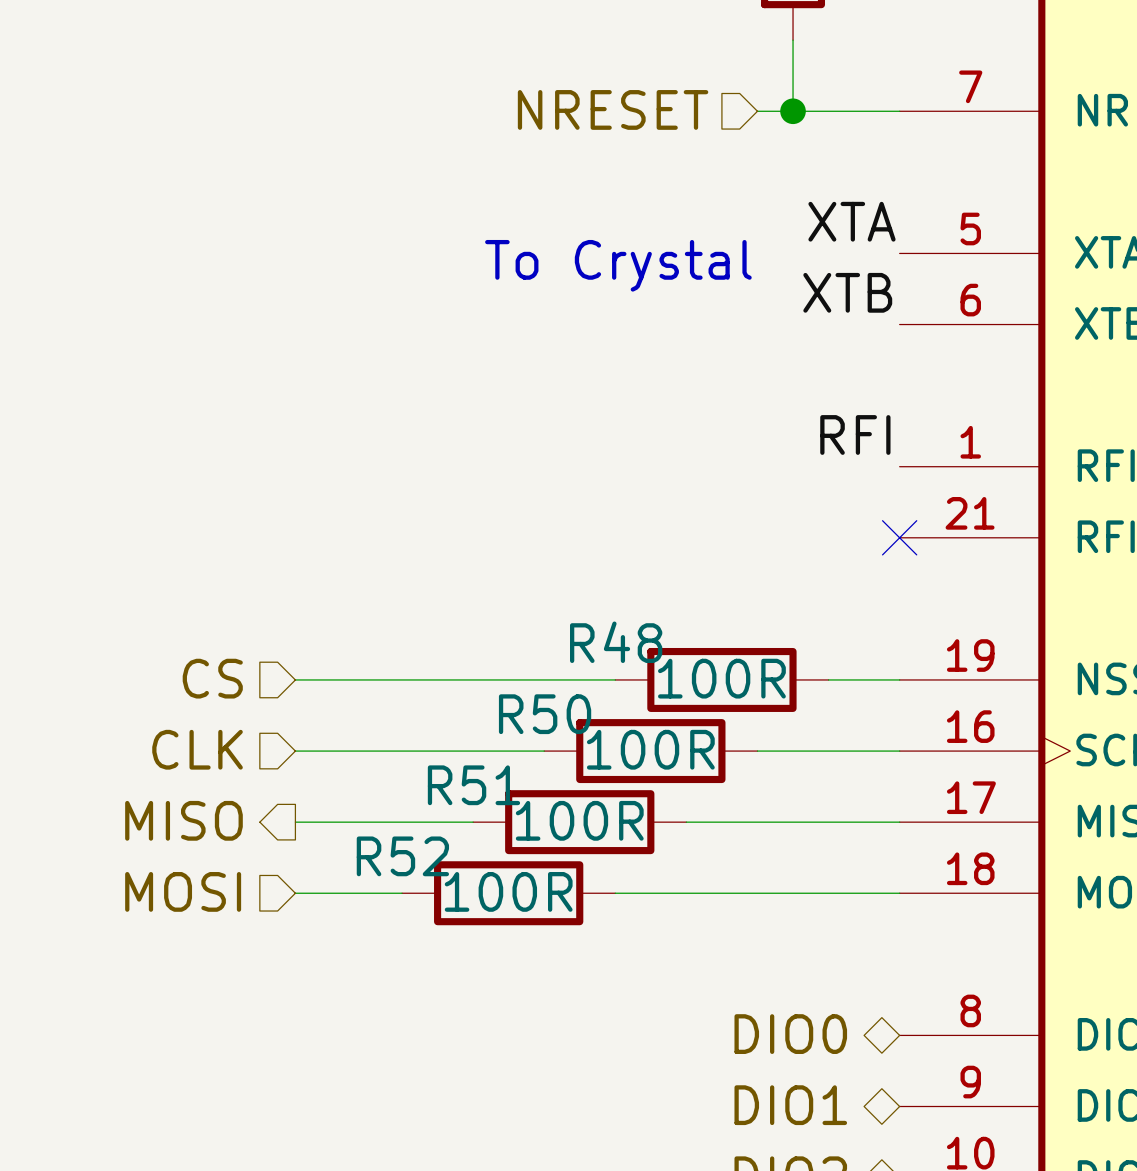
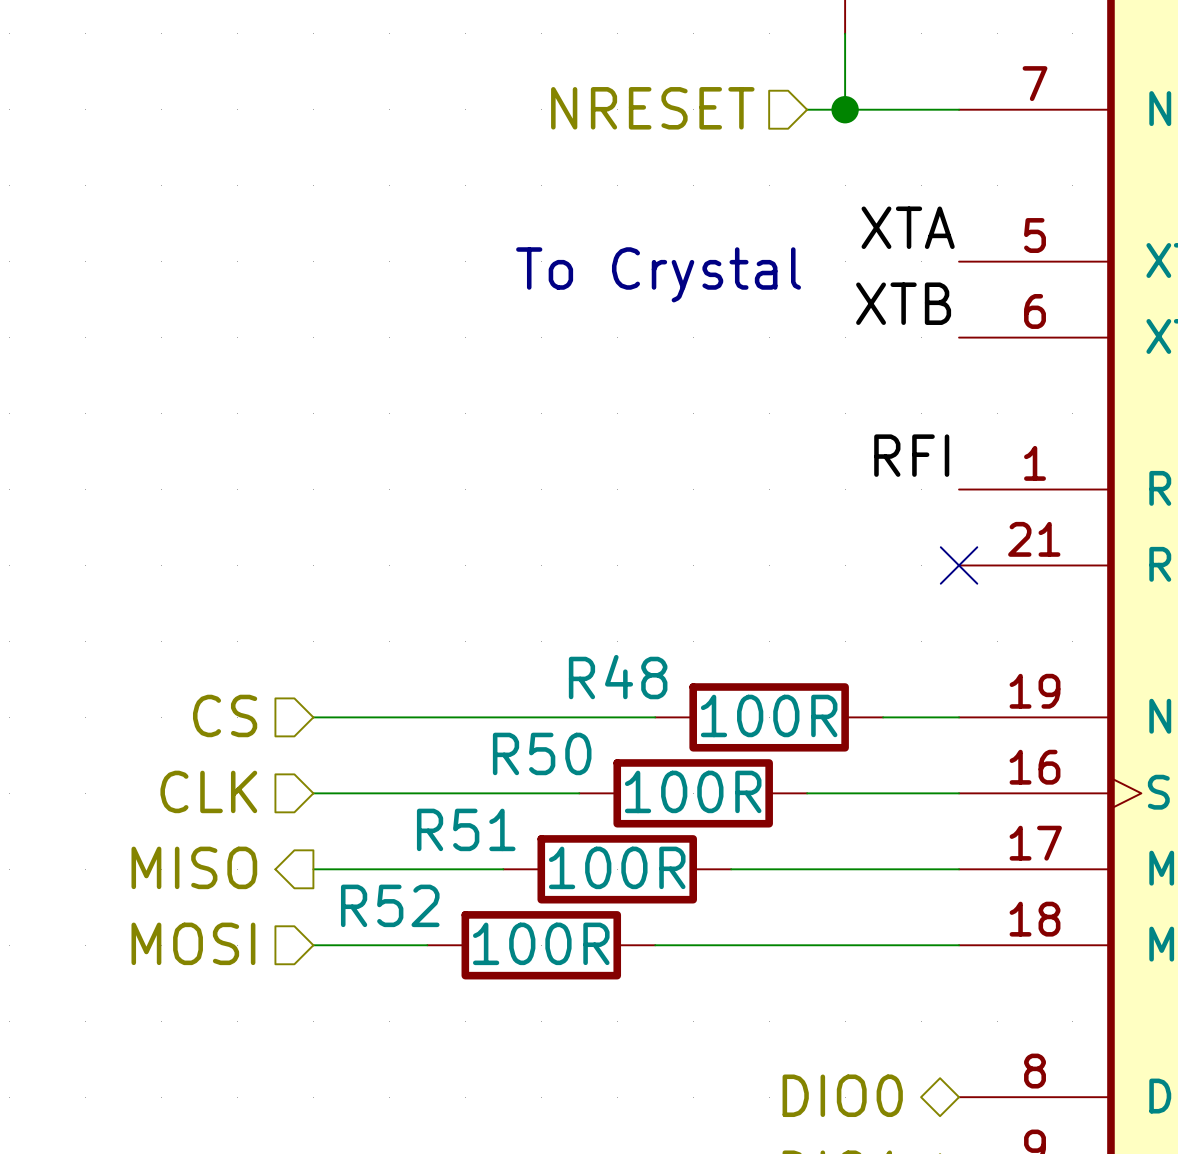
R48 name position: R48 (616, 642) -> R48 (618, 677)
R50 name position: R50 (545, 714) -> R50 (542, 753)
R51 name position: R51 (473, 785) -> R51 (466, 829)
R52 name position: R52 (402, 856) -> R52 (390, 905)

